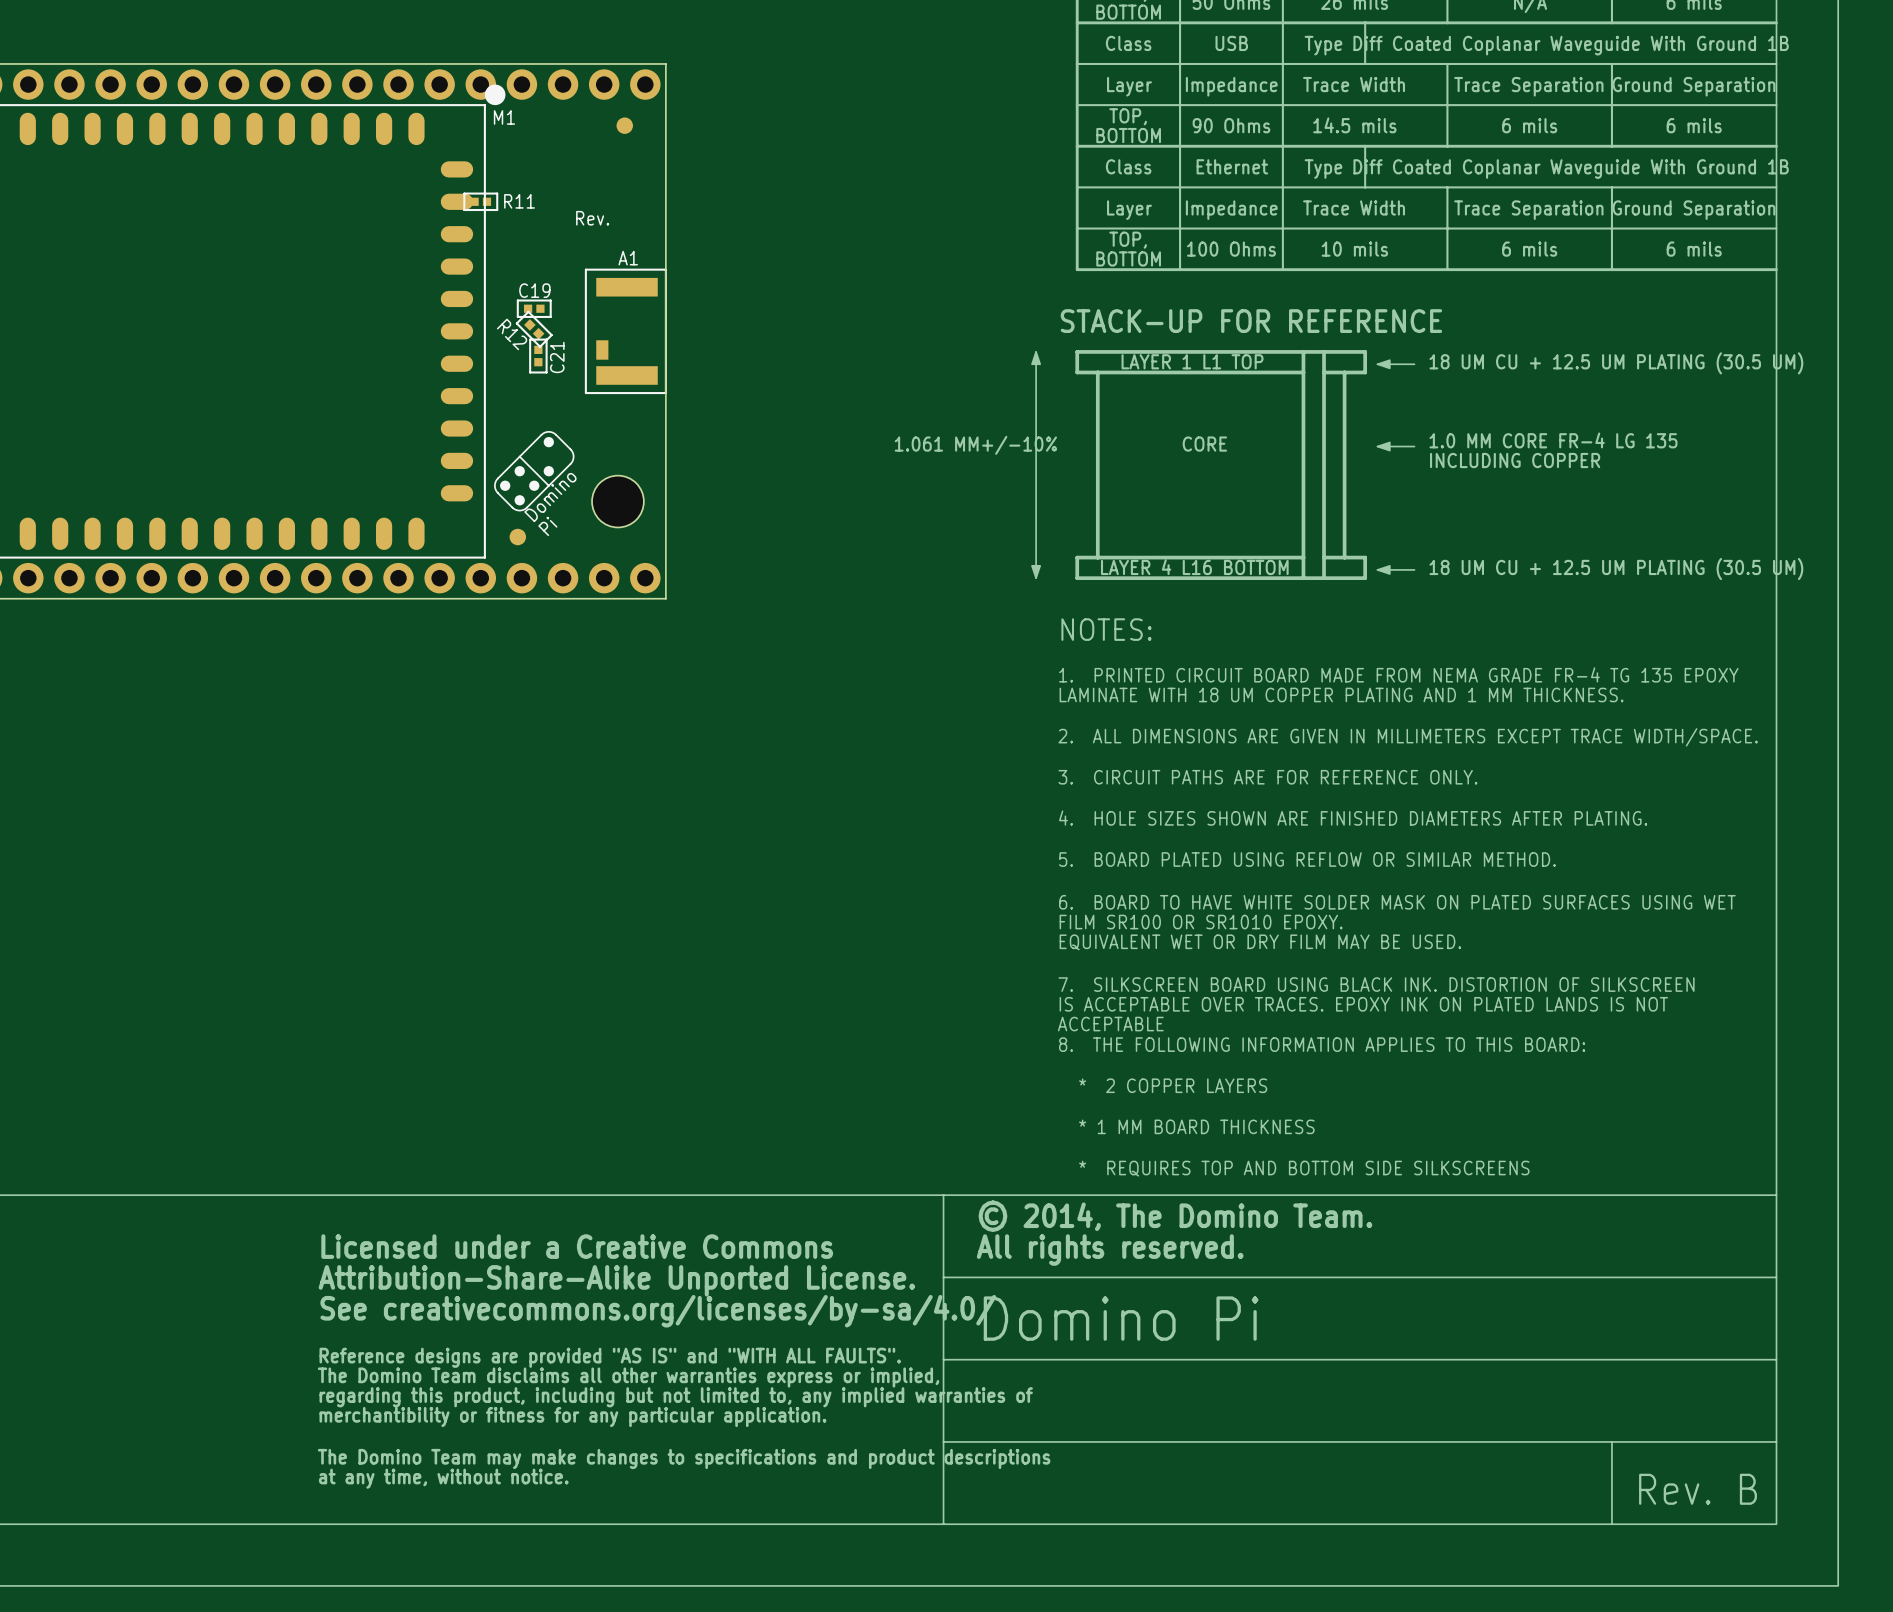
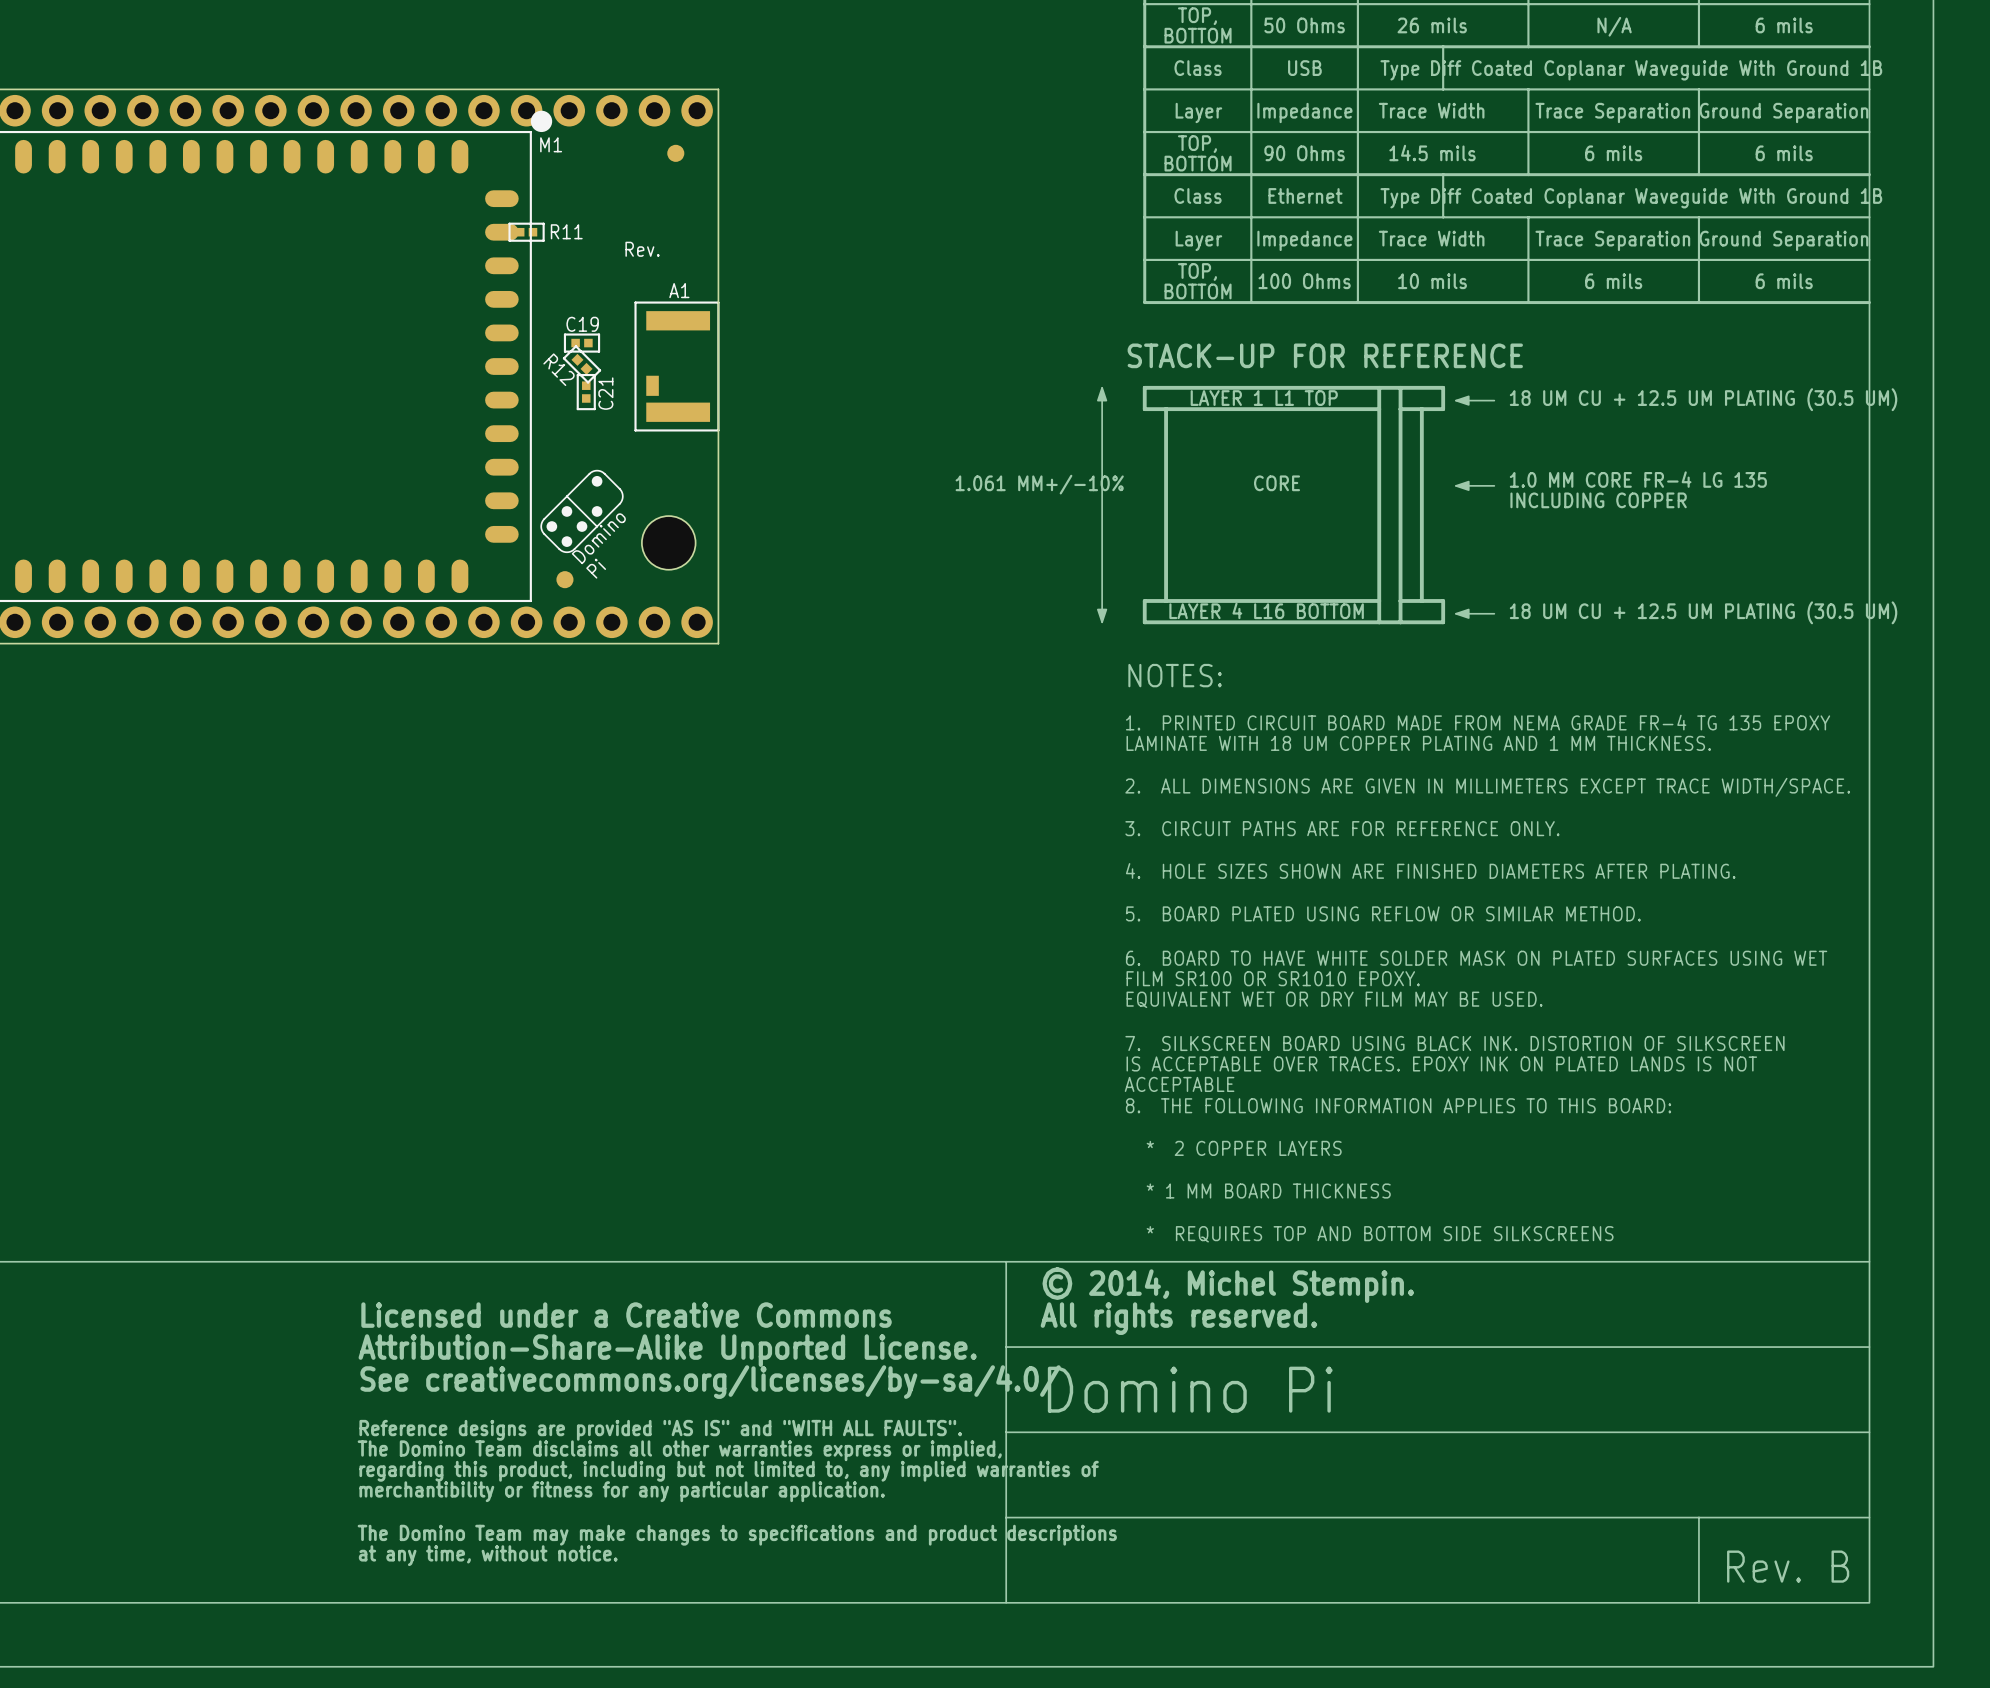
text: © 2014, The Domino Team. (1175, 1216) -> © 2014, Michel Stempin. (1228, 1285)

